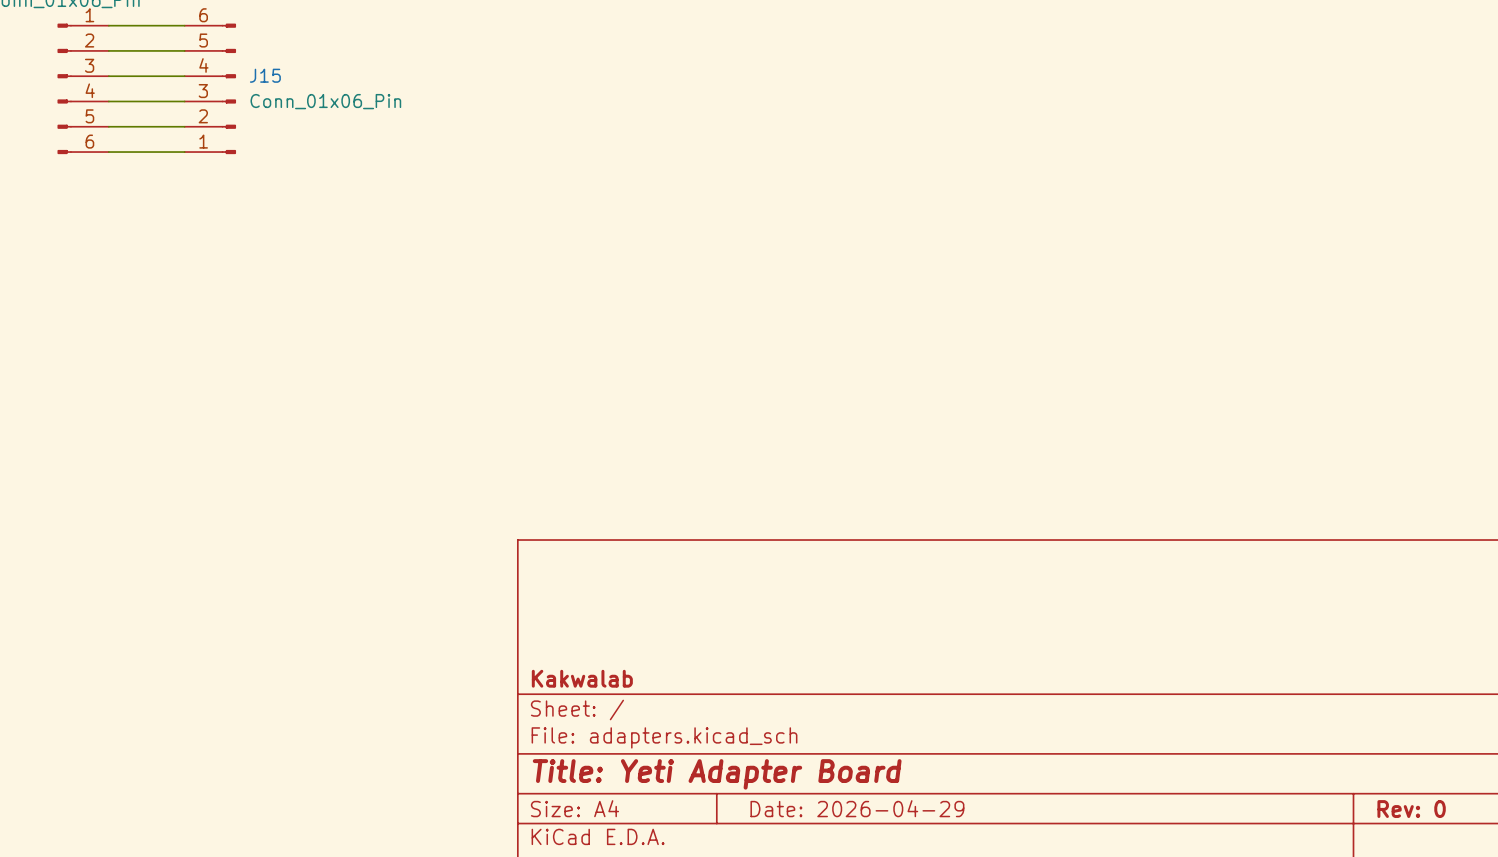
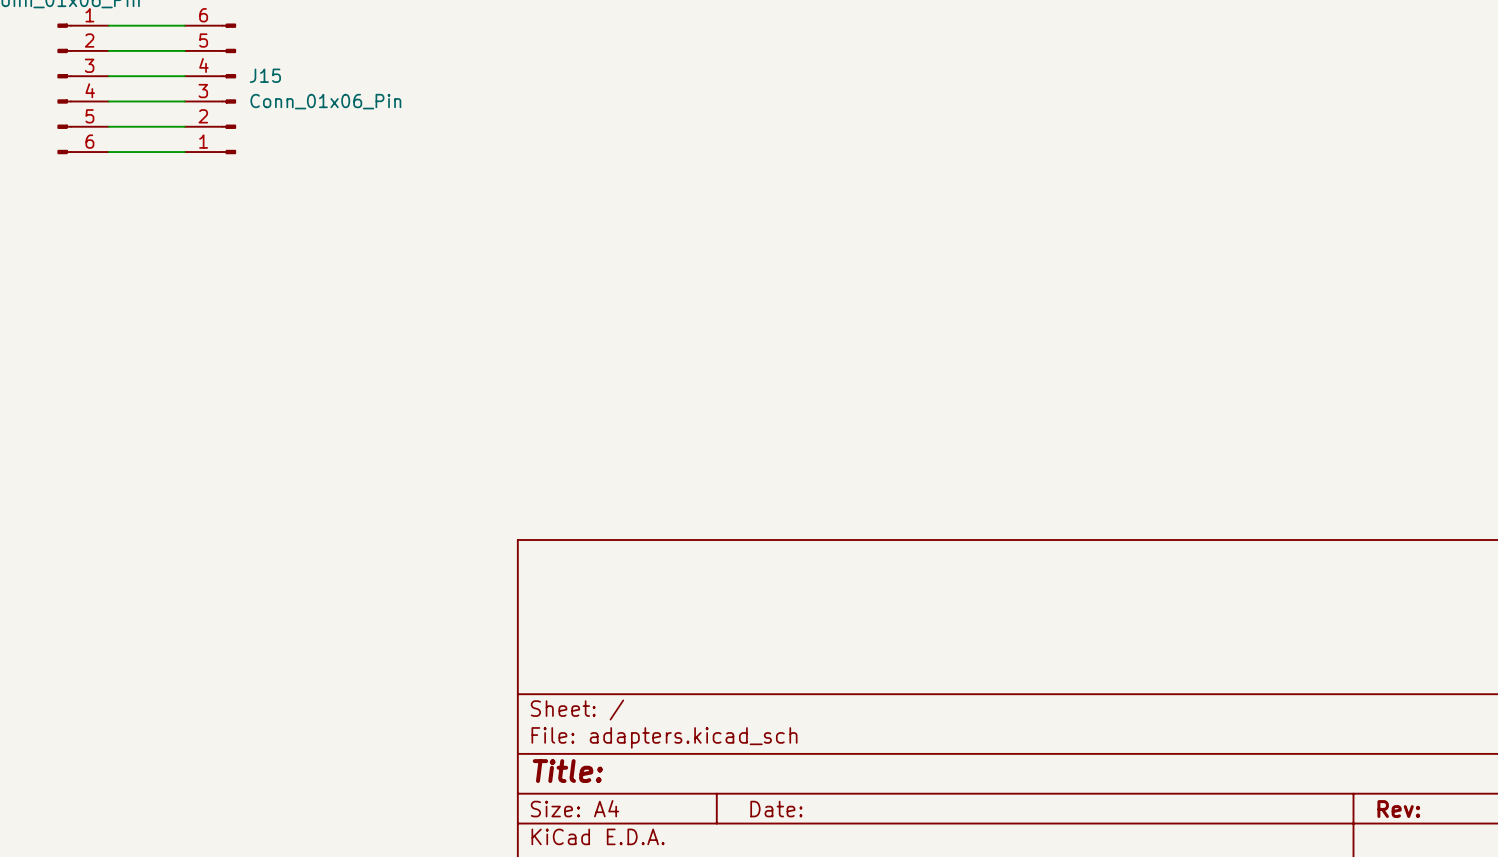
title block: Kakwalab (582, 678) -> none
title block: Title: Yeti Adapter Board (717, 774) -> Title: (567, 771)
title block: Date: 2026-04-29 (857, 808) -> Date: (776, 809)
title block: Rev: 0 (1411, 809) -> Rev: (1398, 809)

